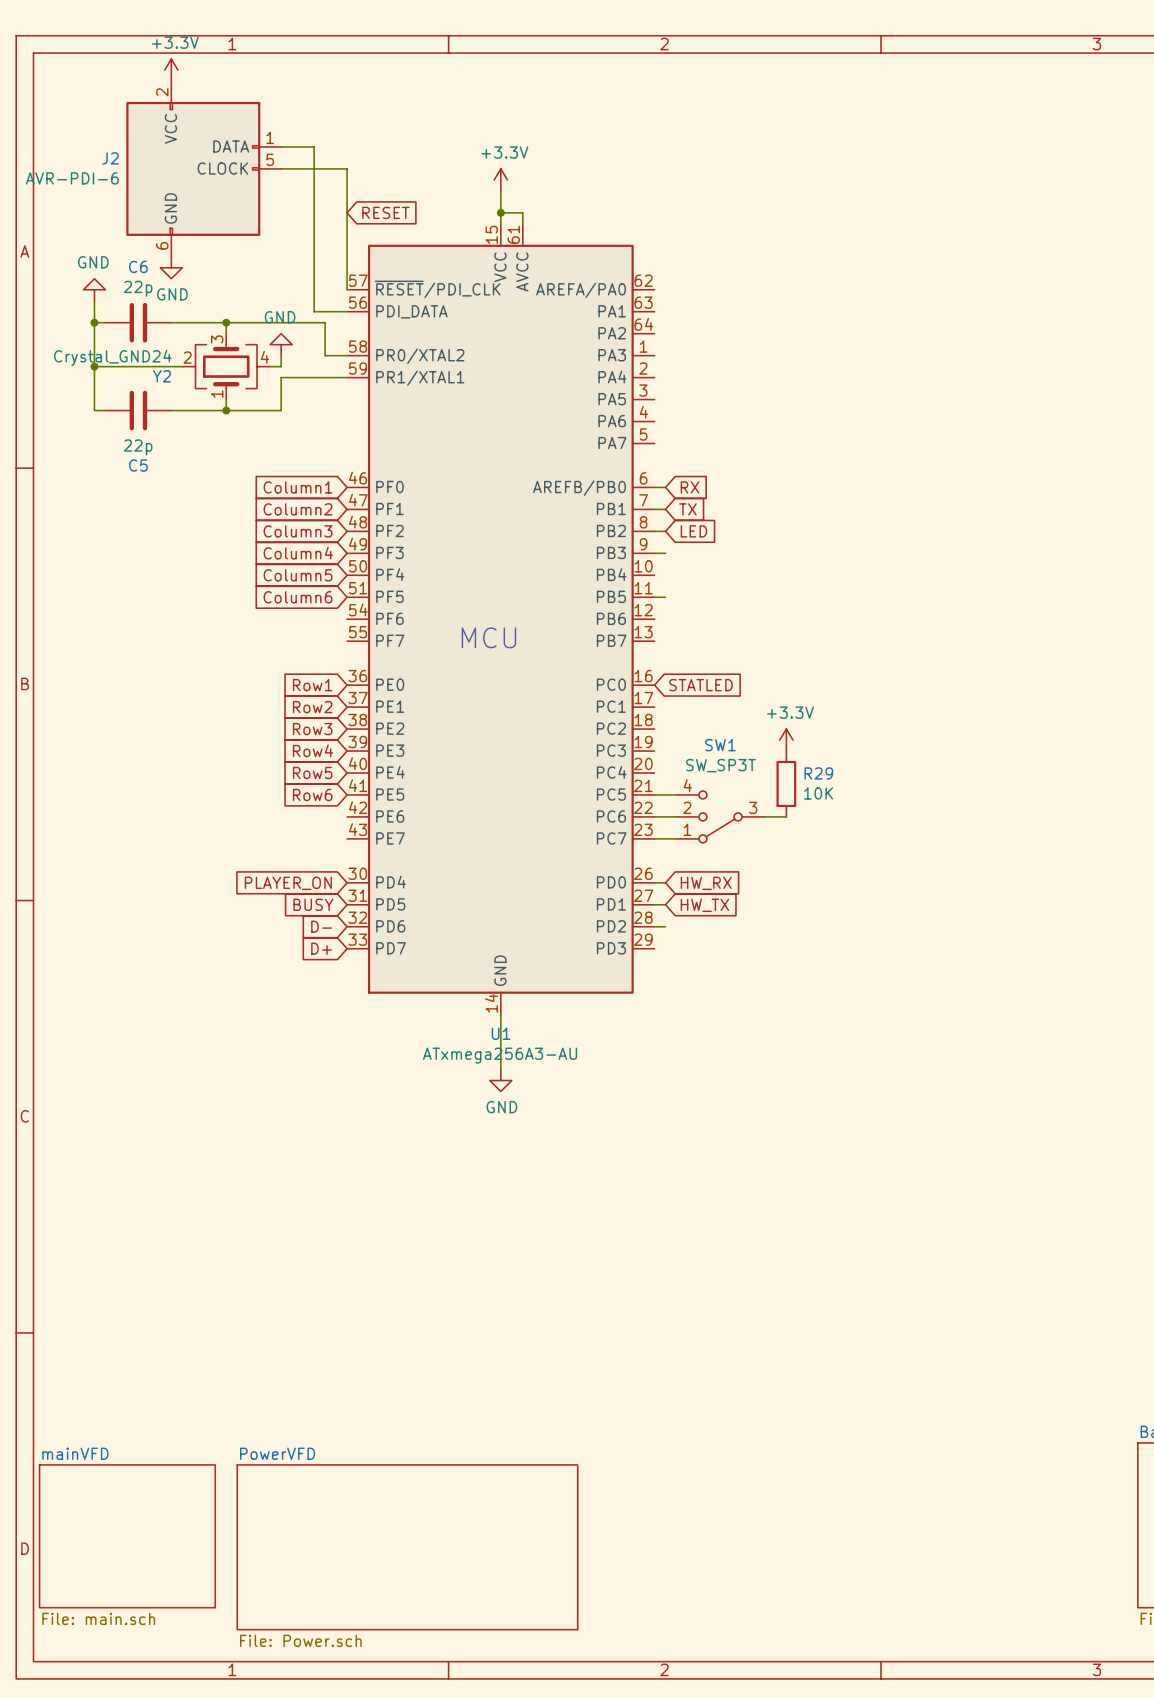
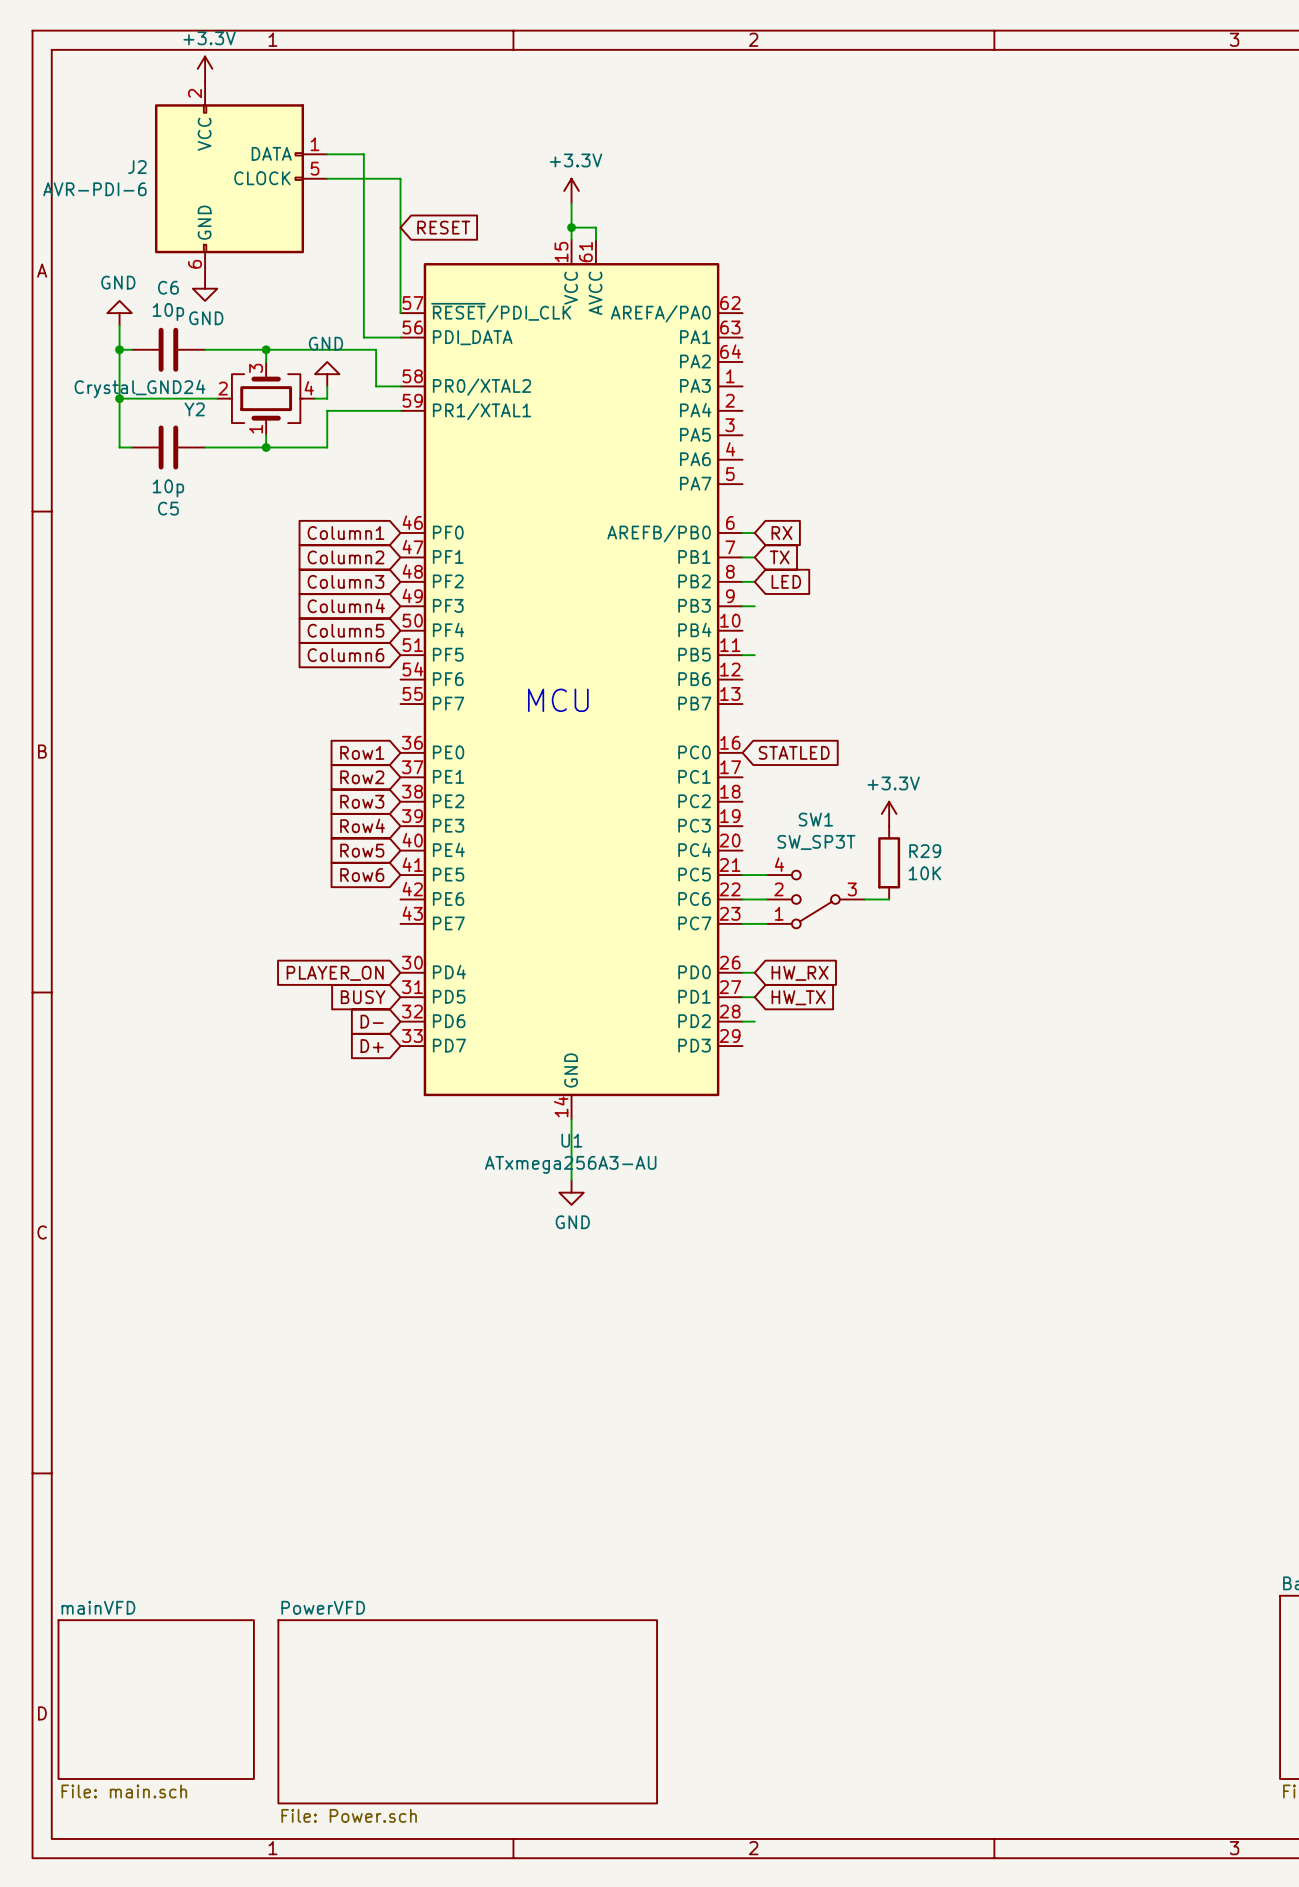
C6 value: 22p (138, 288) -> 10p (168, 312)
C5 value: 22p (138, 447) -> 10p (168, 488)

